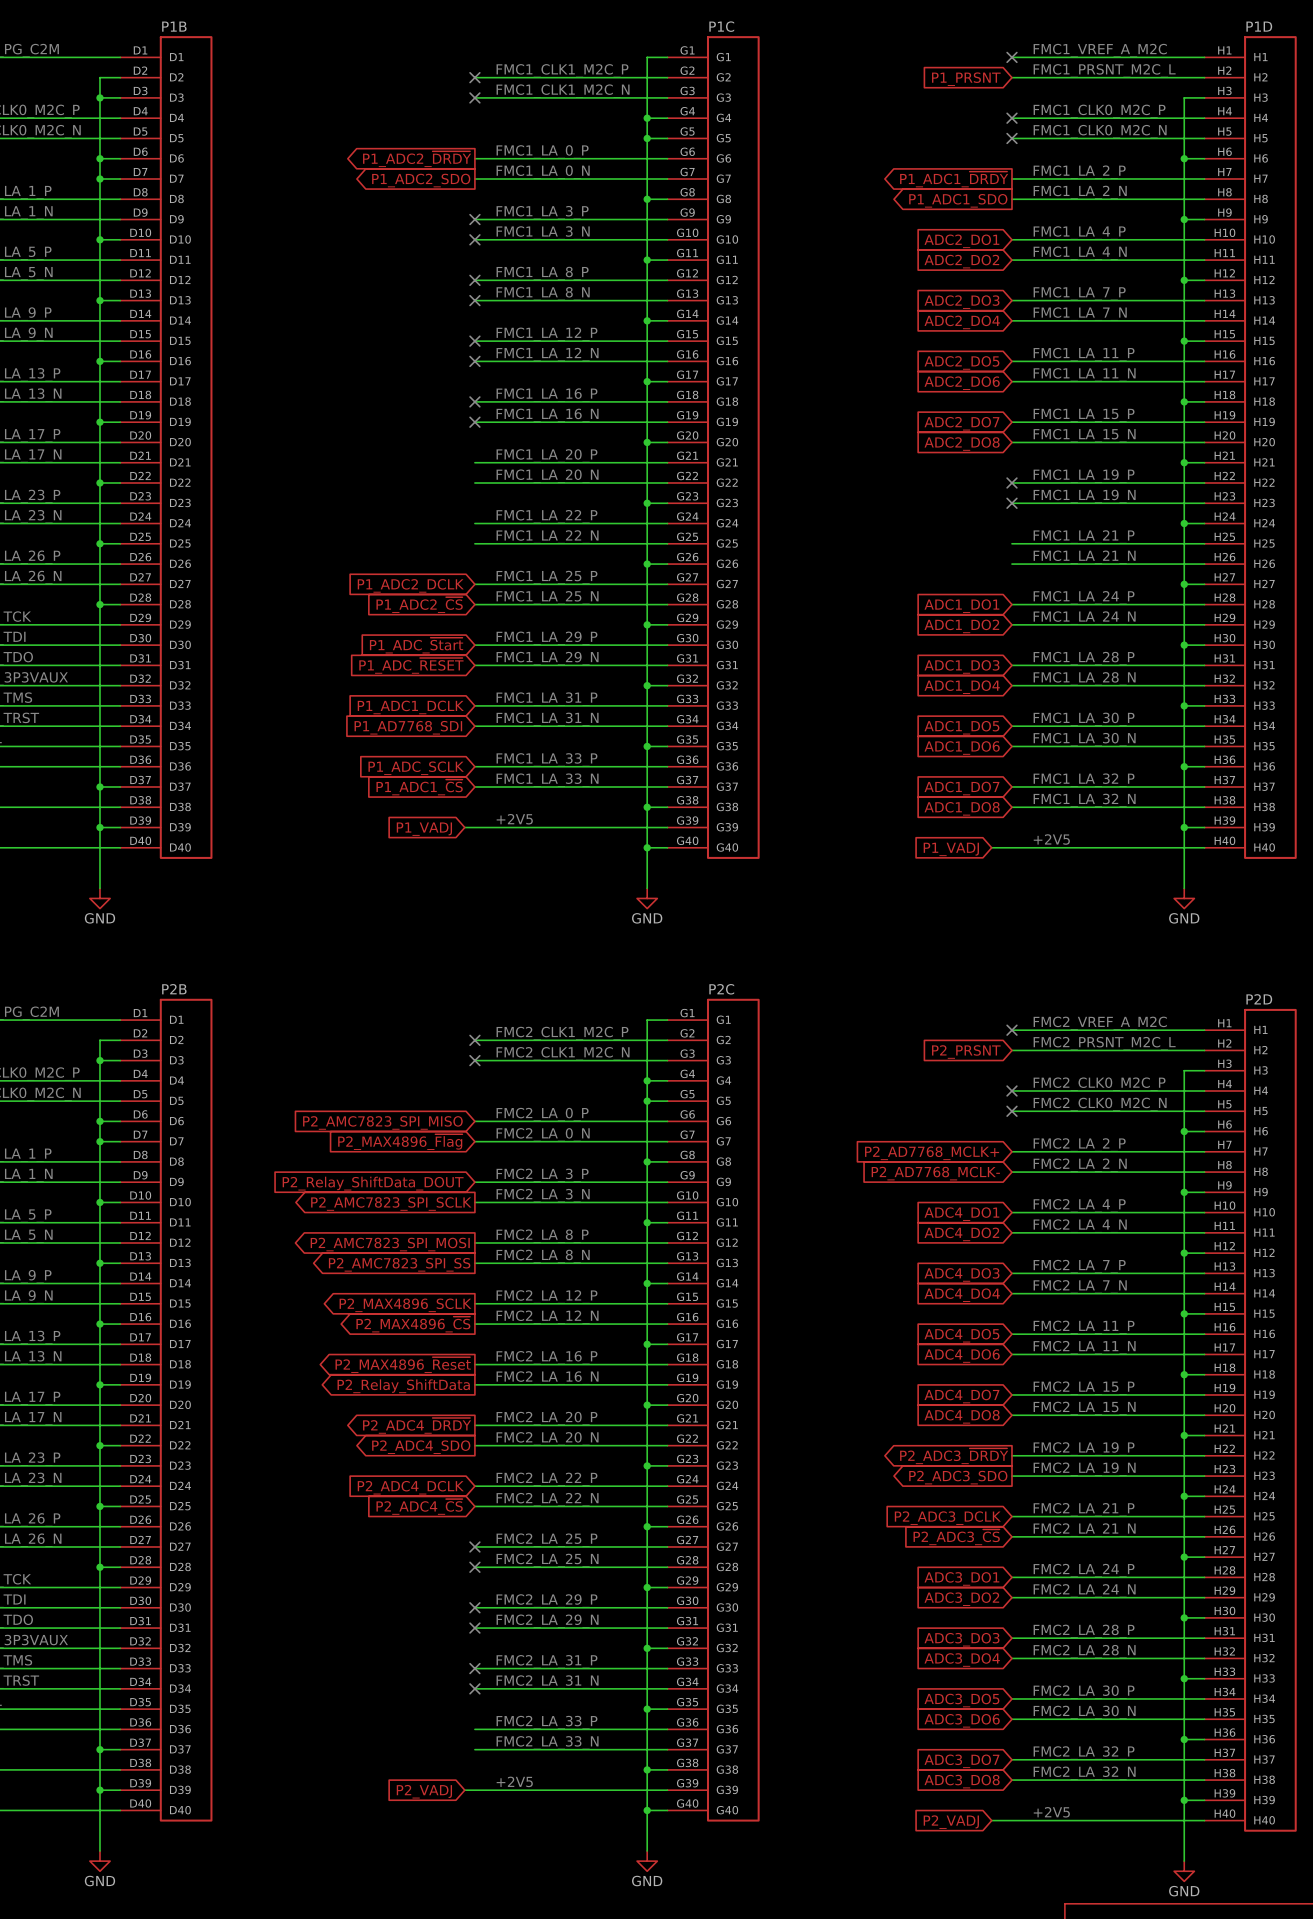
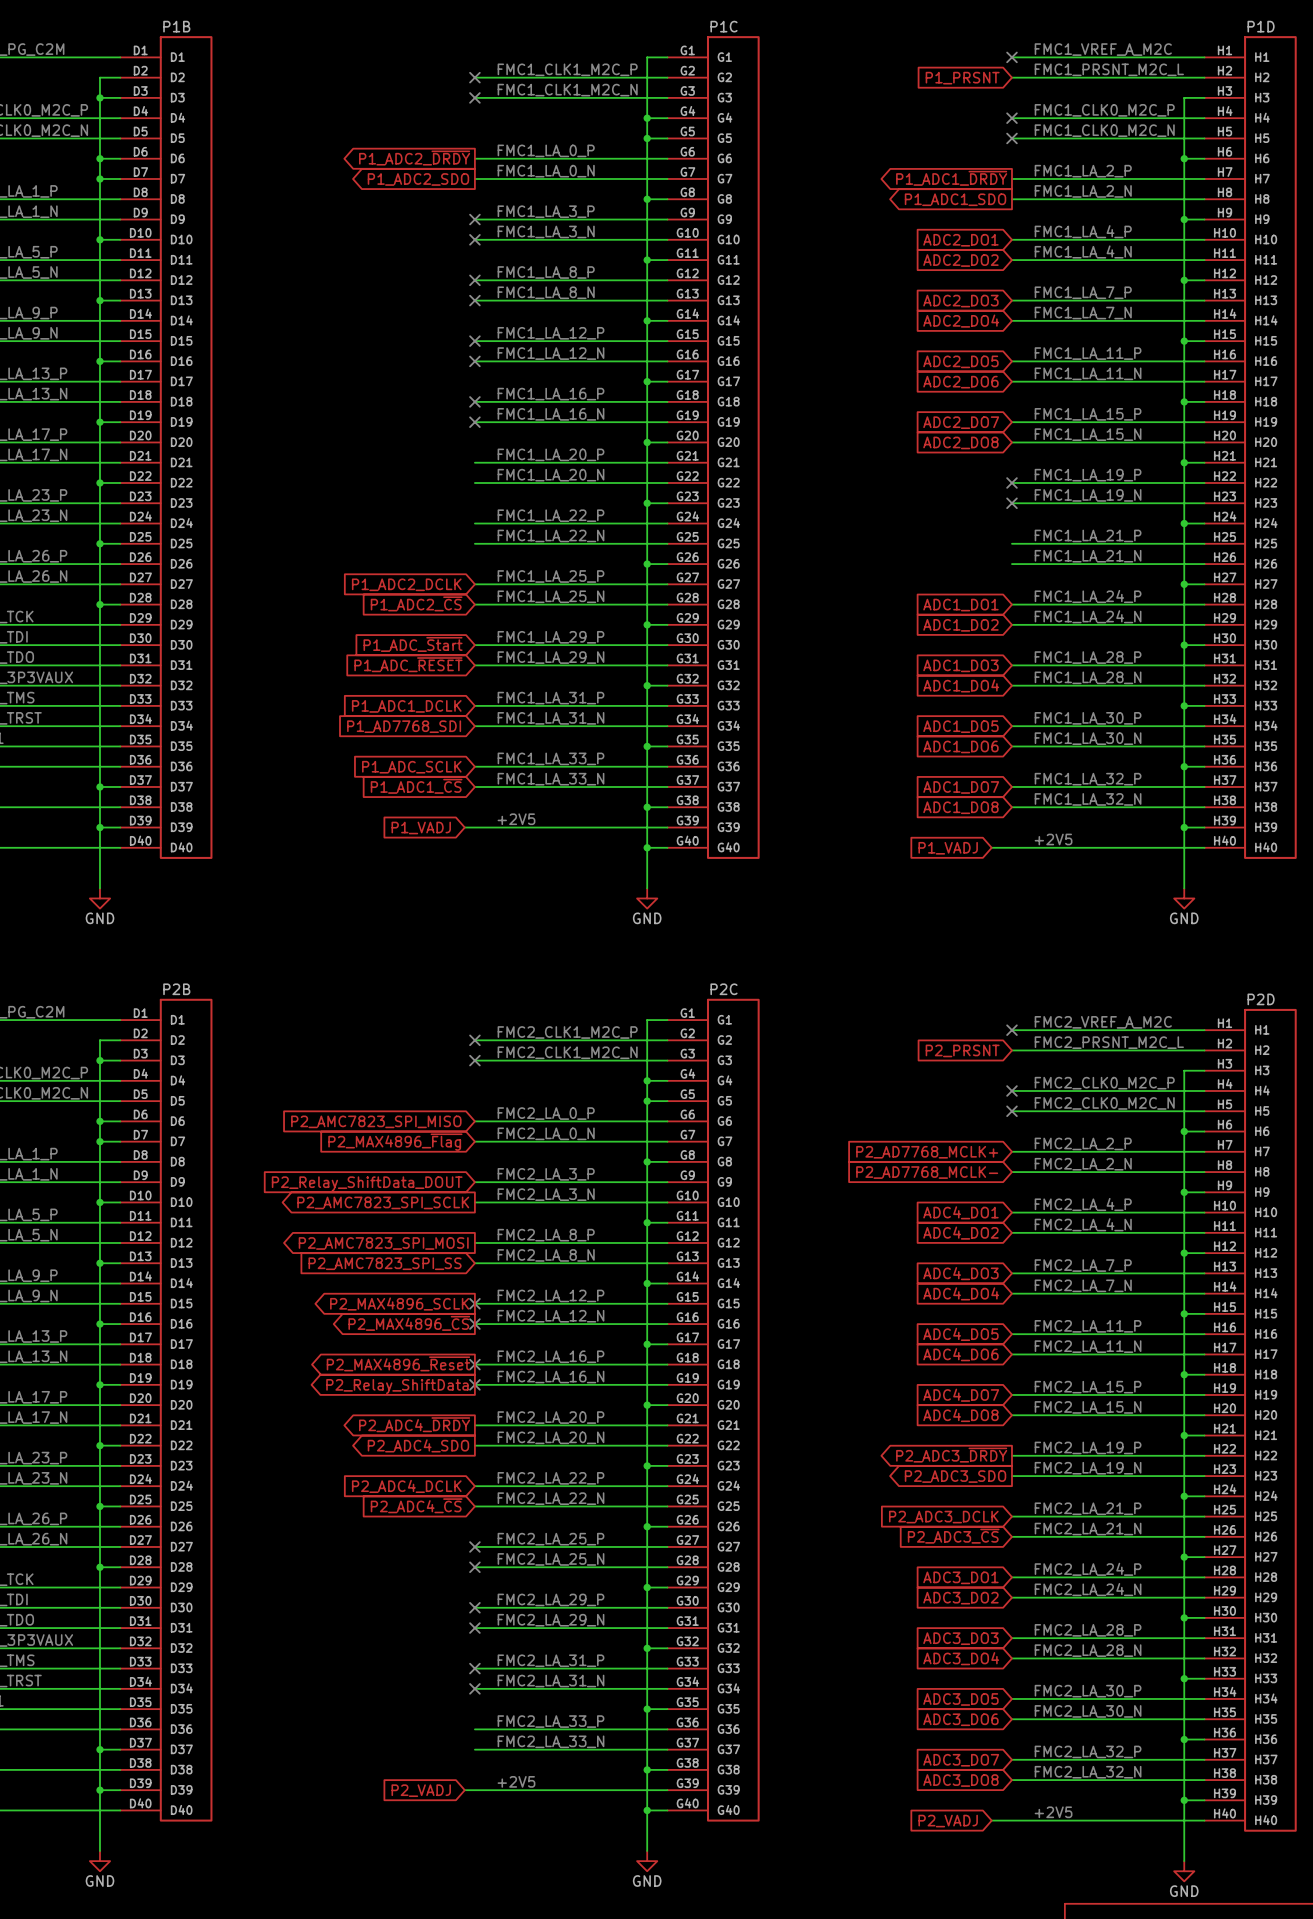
global label shape: output (399, 1264) -> input (385, 1263)
no-connect mark: none -> (474, 1303)
no-connect mark: none -> (474, 1324)
no-connect mark: none -> (474, 1364)
no-connect mark: none -> (474, 1384)

